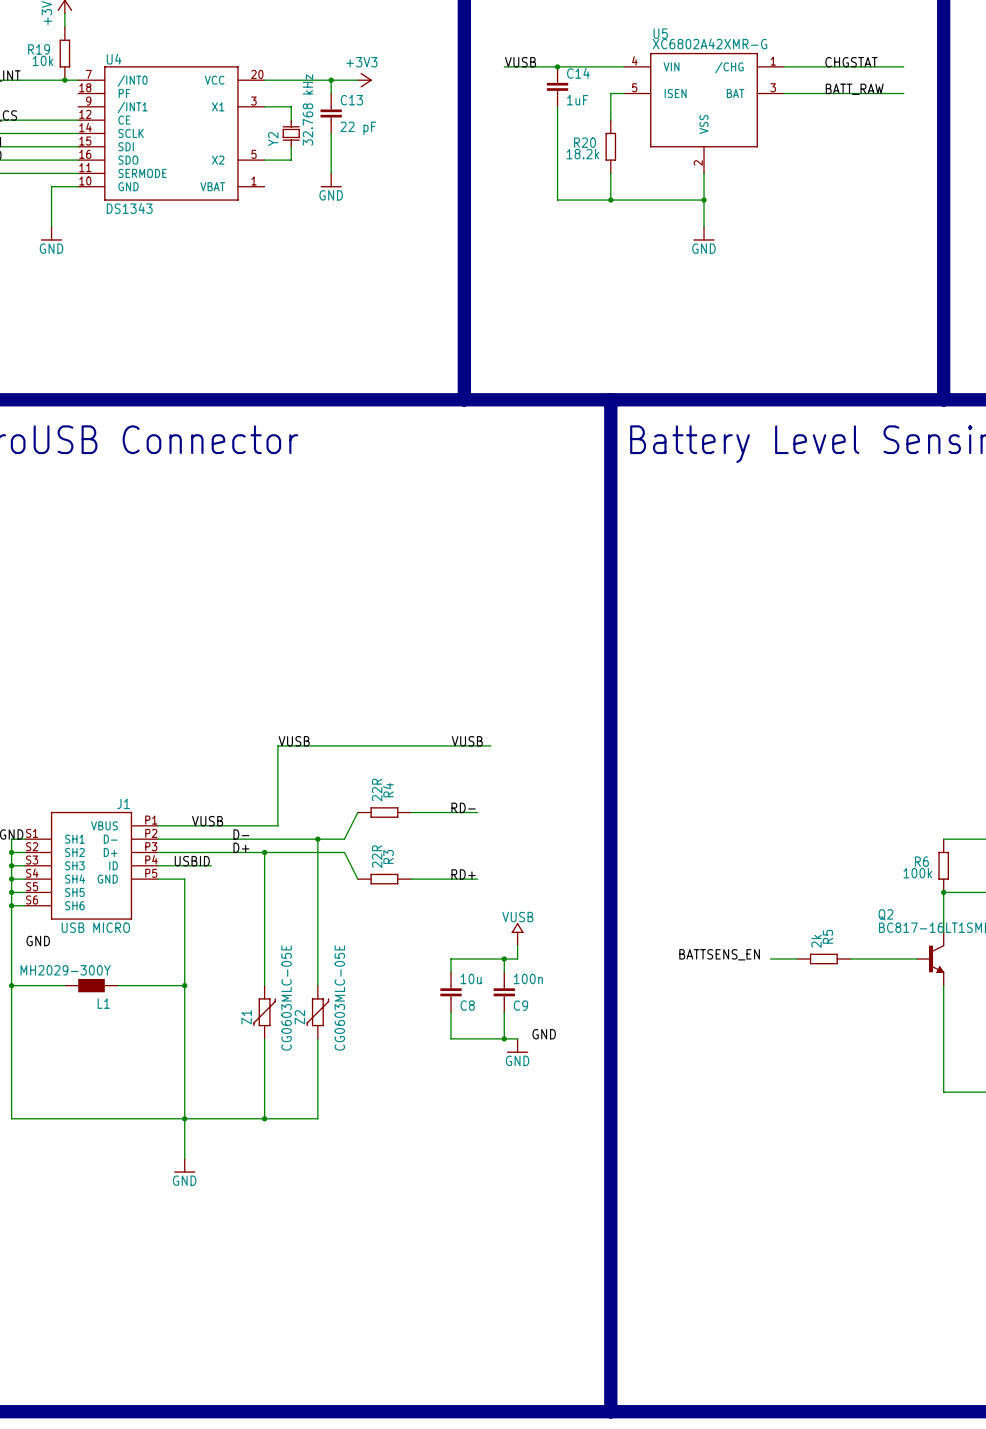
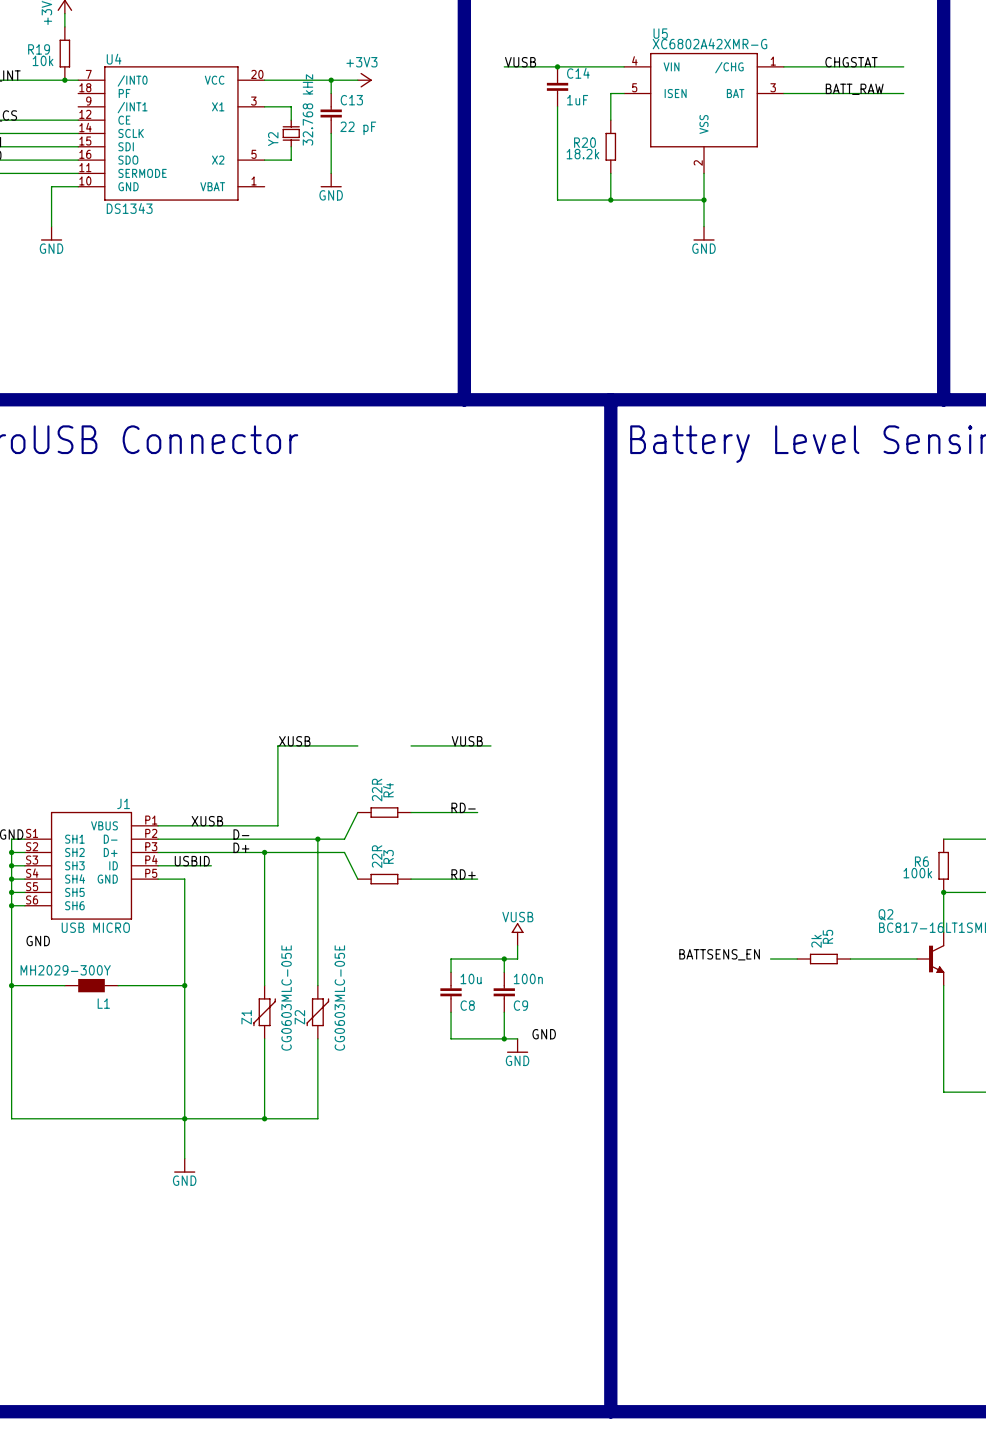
label: VUSB (294, 741) -> XUSB (294, 741)
wire: (357, 745) (411, 745) -> none
label: VUSB (207, 821) -> XUSB (207, 821)

